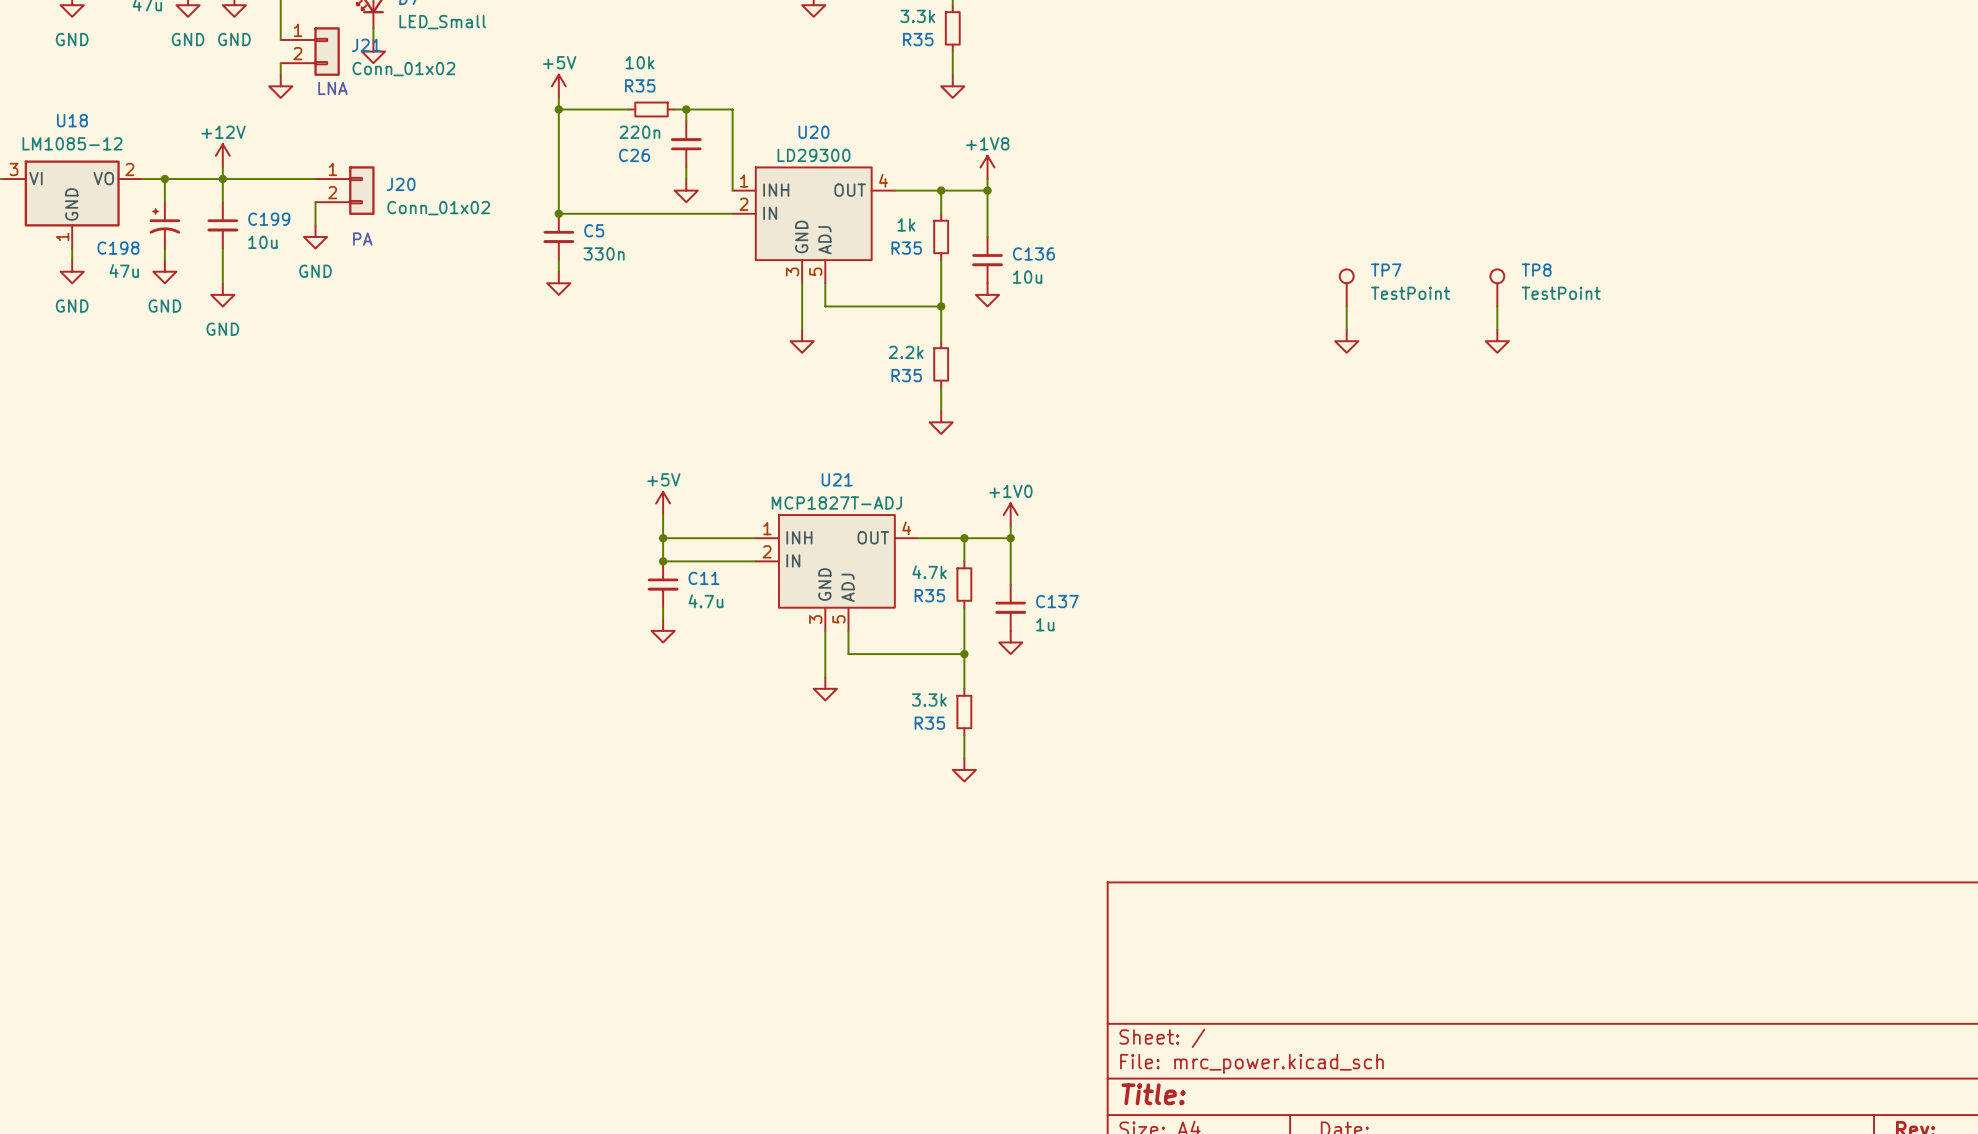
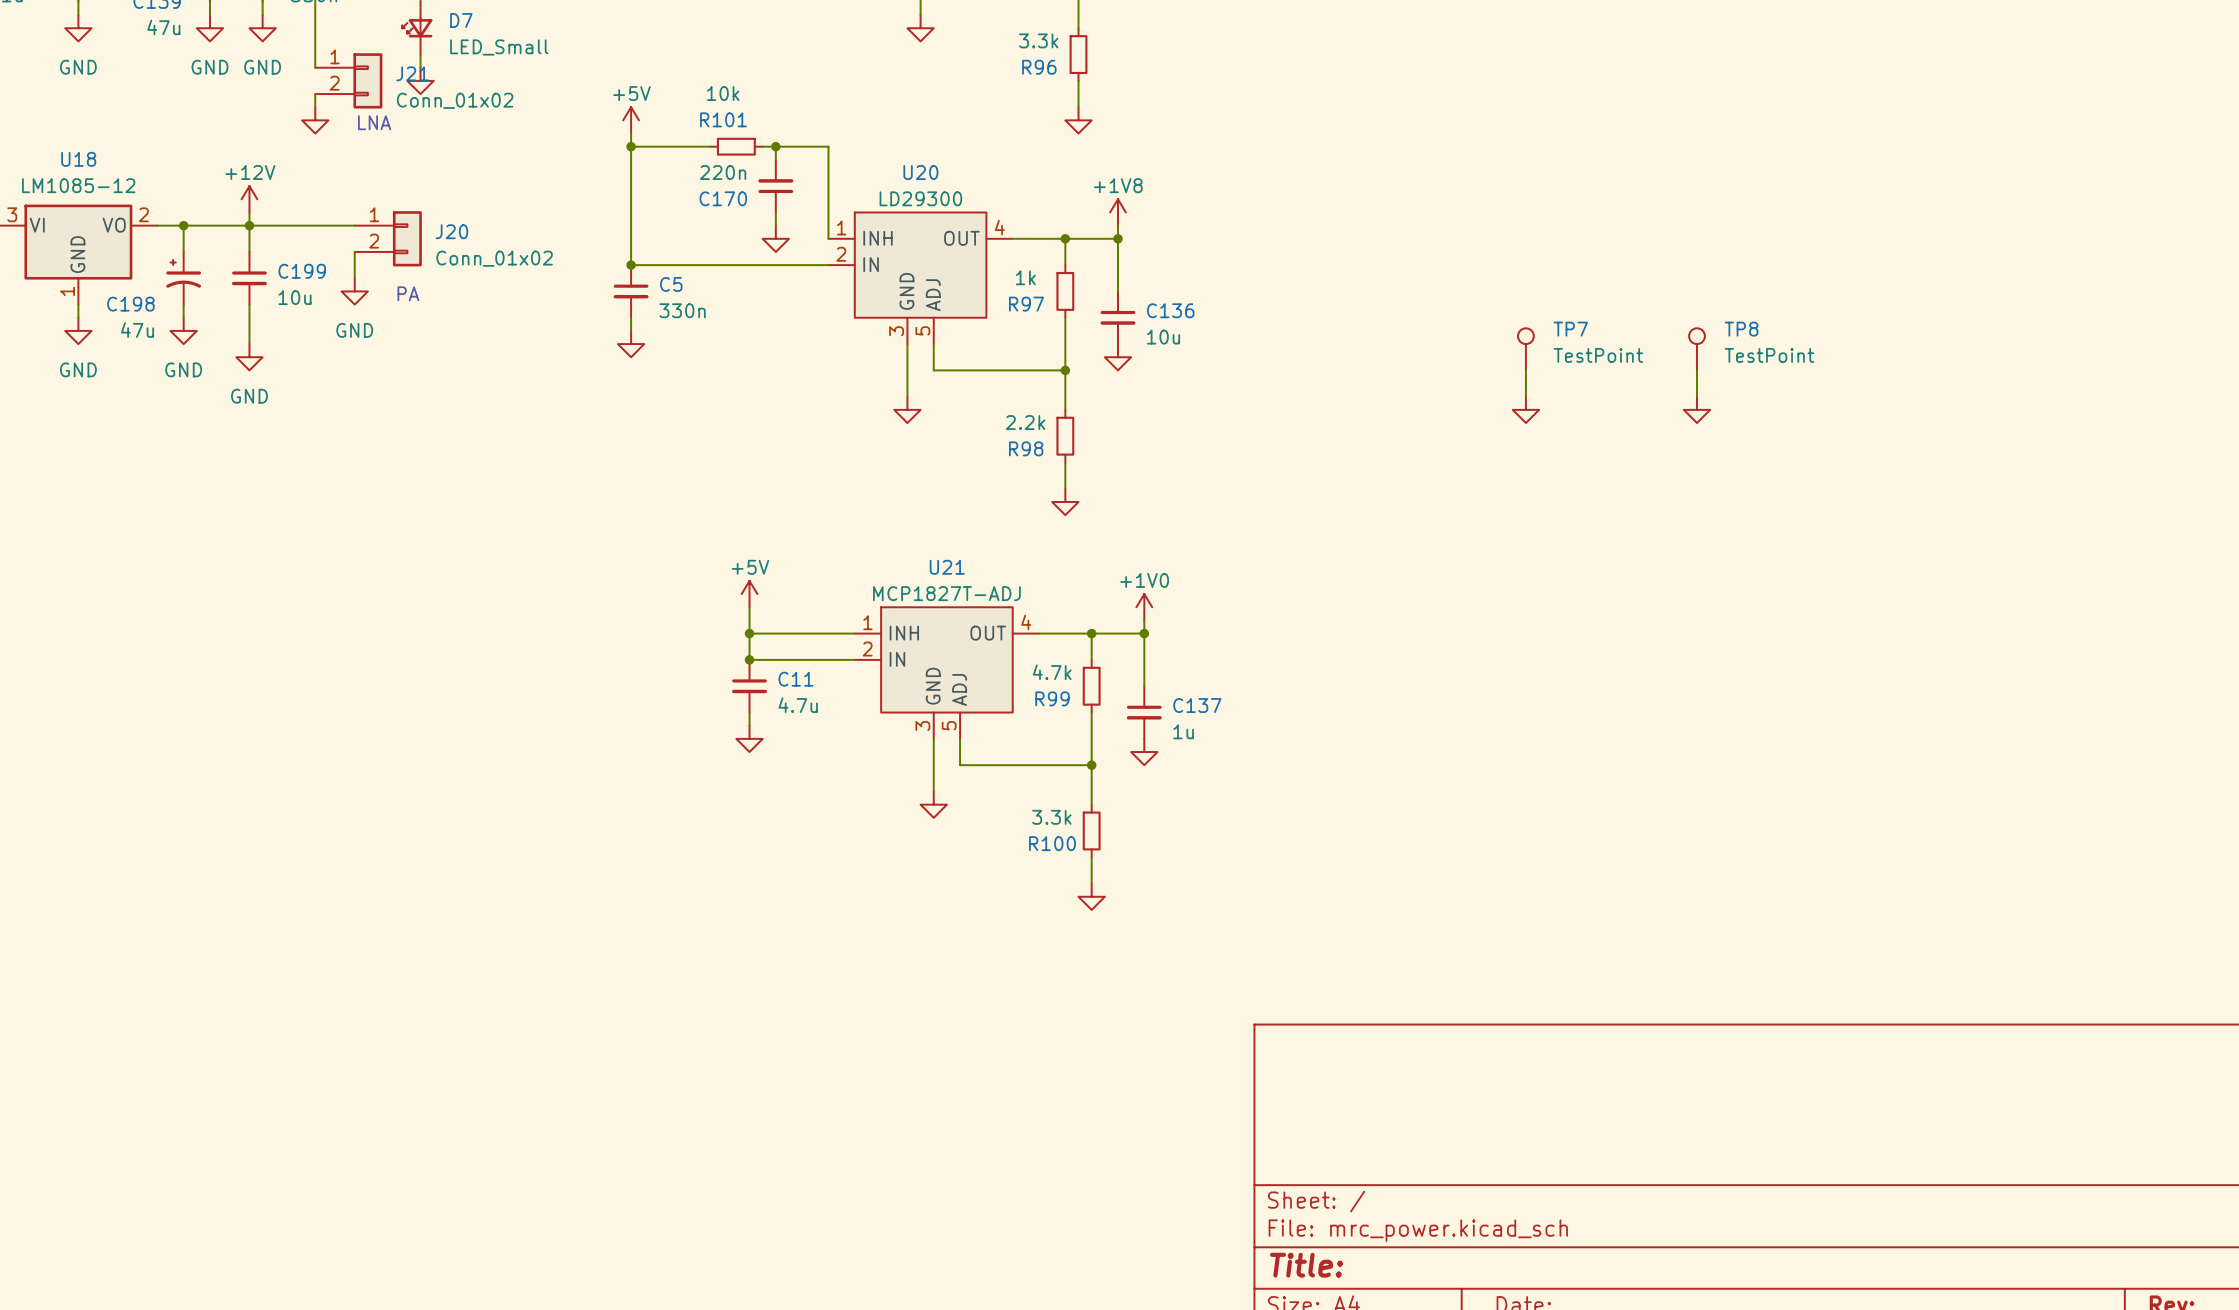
R35 name: R35 (918, 39) -> R96 (1039, 67)
R35 name: R35 (640, 85) -> R101 (723, 119)
C26 name: C26 (634, 155) -> C170 (723, 198)
R35 name: R35 (906, 248) -> R97 (1026, 304)
R35 name: R35 (906, 375) -> R98 (1026, 448)
R35 name: R35 (929, 595) -> R99 (1052, 698)
R35 name: R35 (929, 723) -> R100 (1052, 843)

